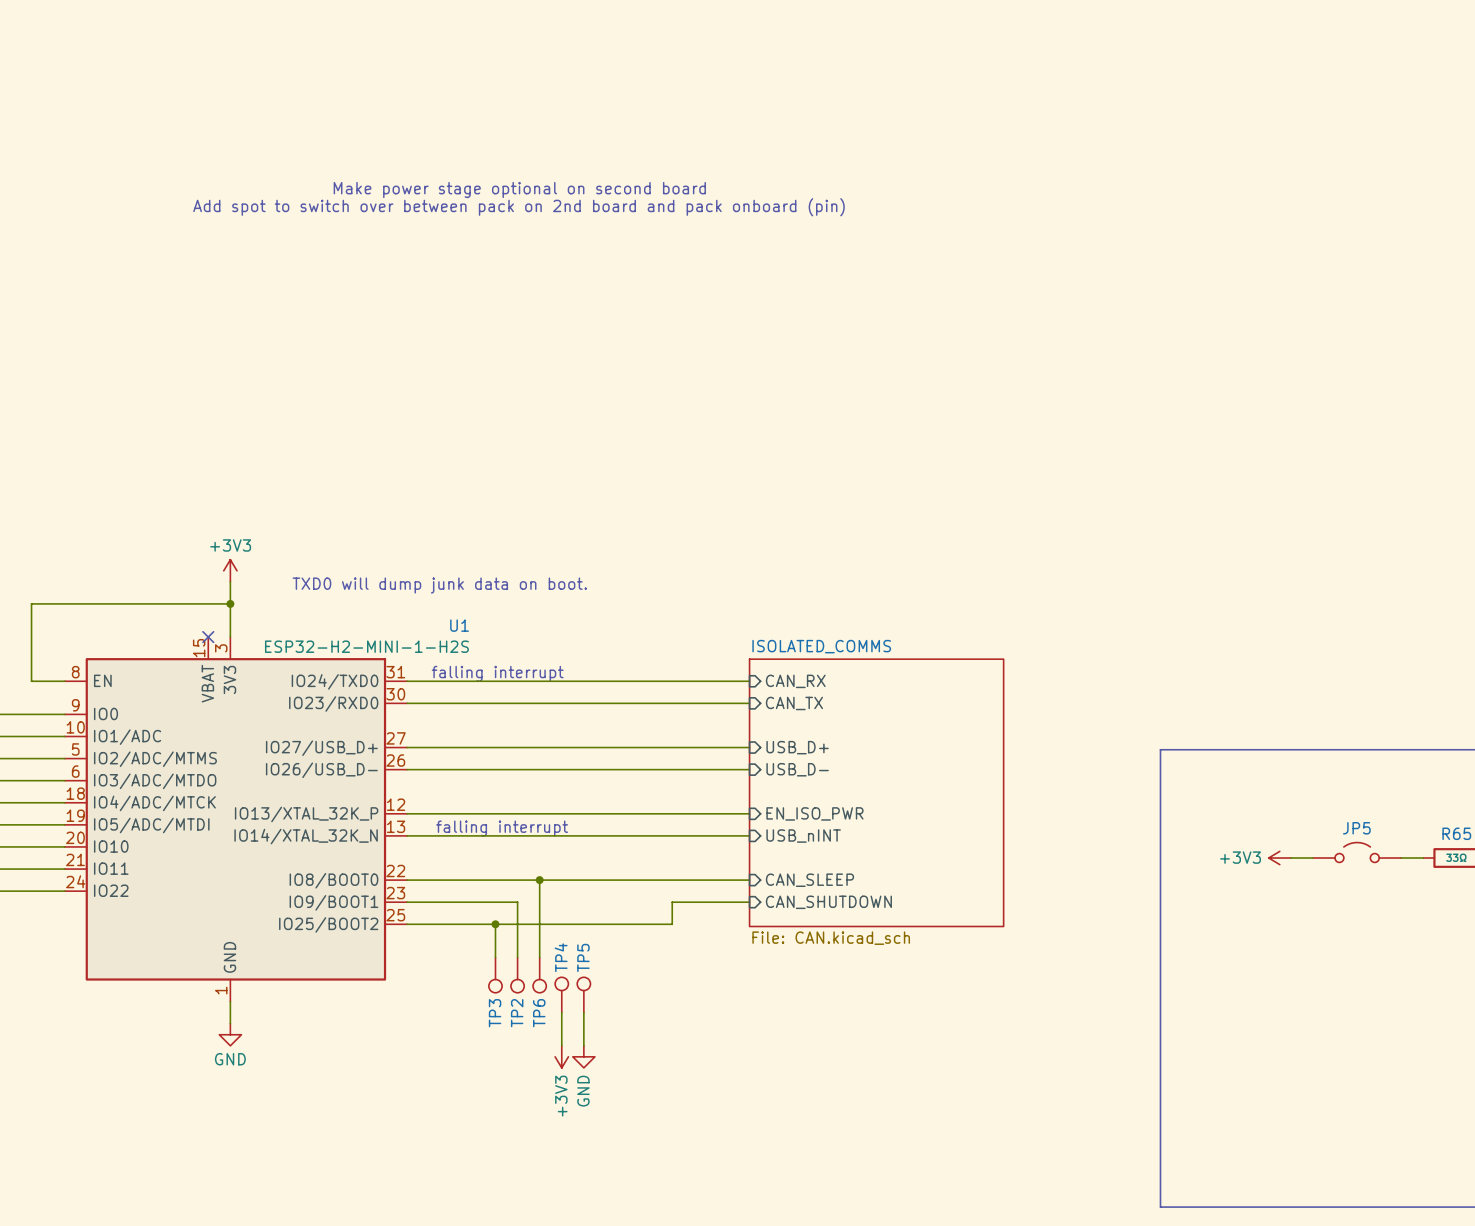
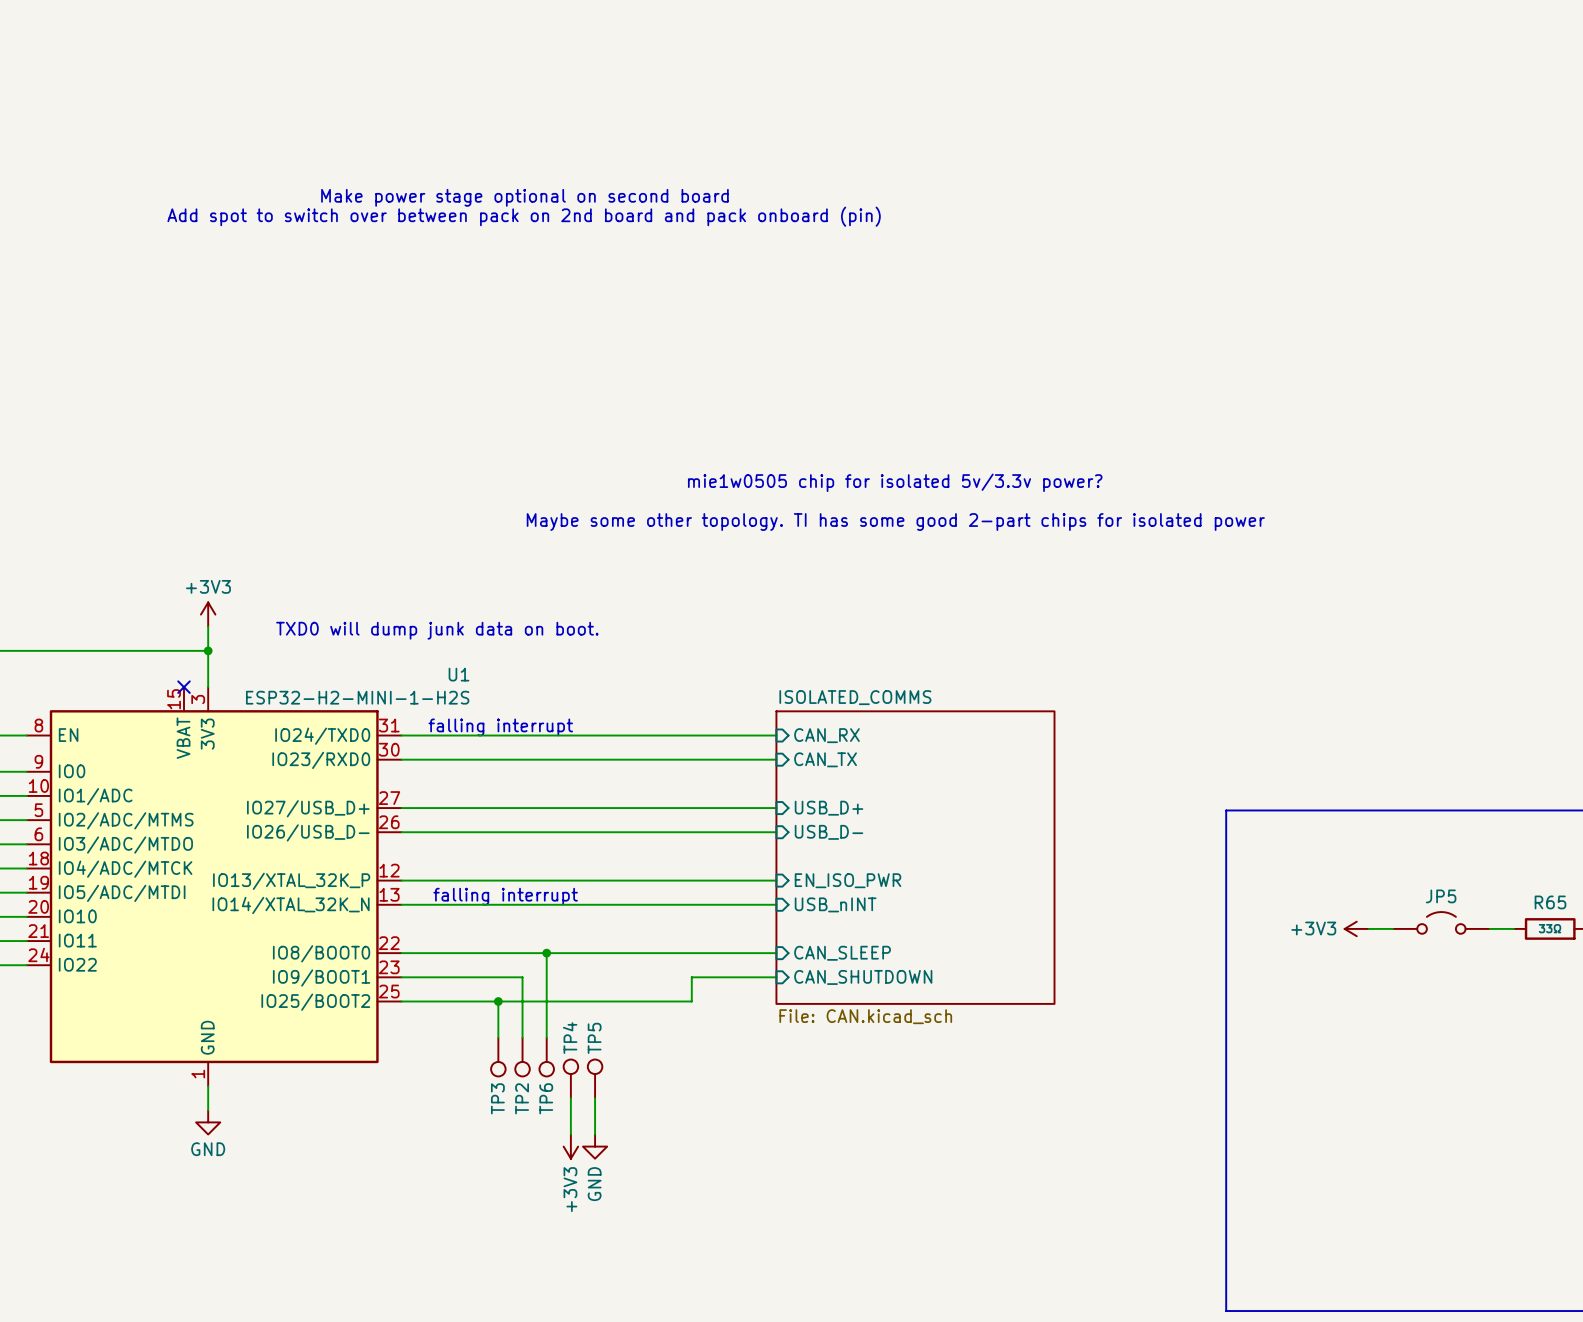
text: none -> mie1w0505 chip for isolated 5v/3.3v power? (895, 482)
text: none -> Maybe some other topology. TI has some good 2-part chips for isolated power (895, 522)

